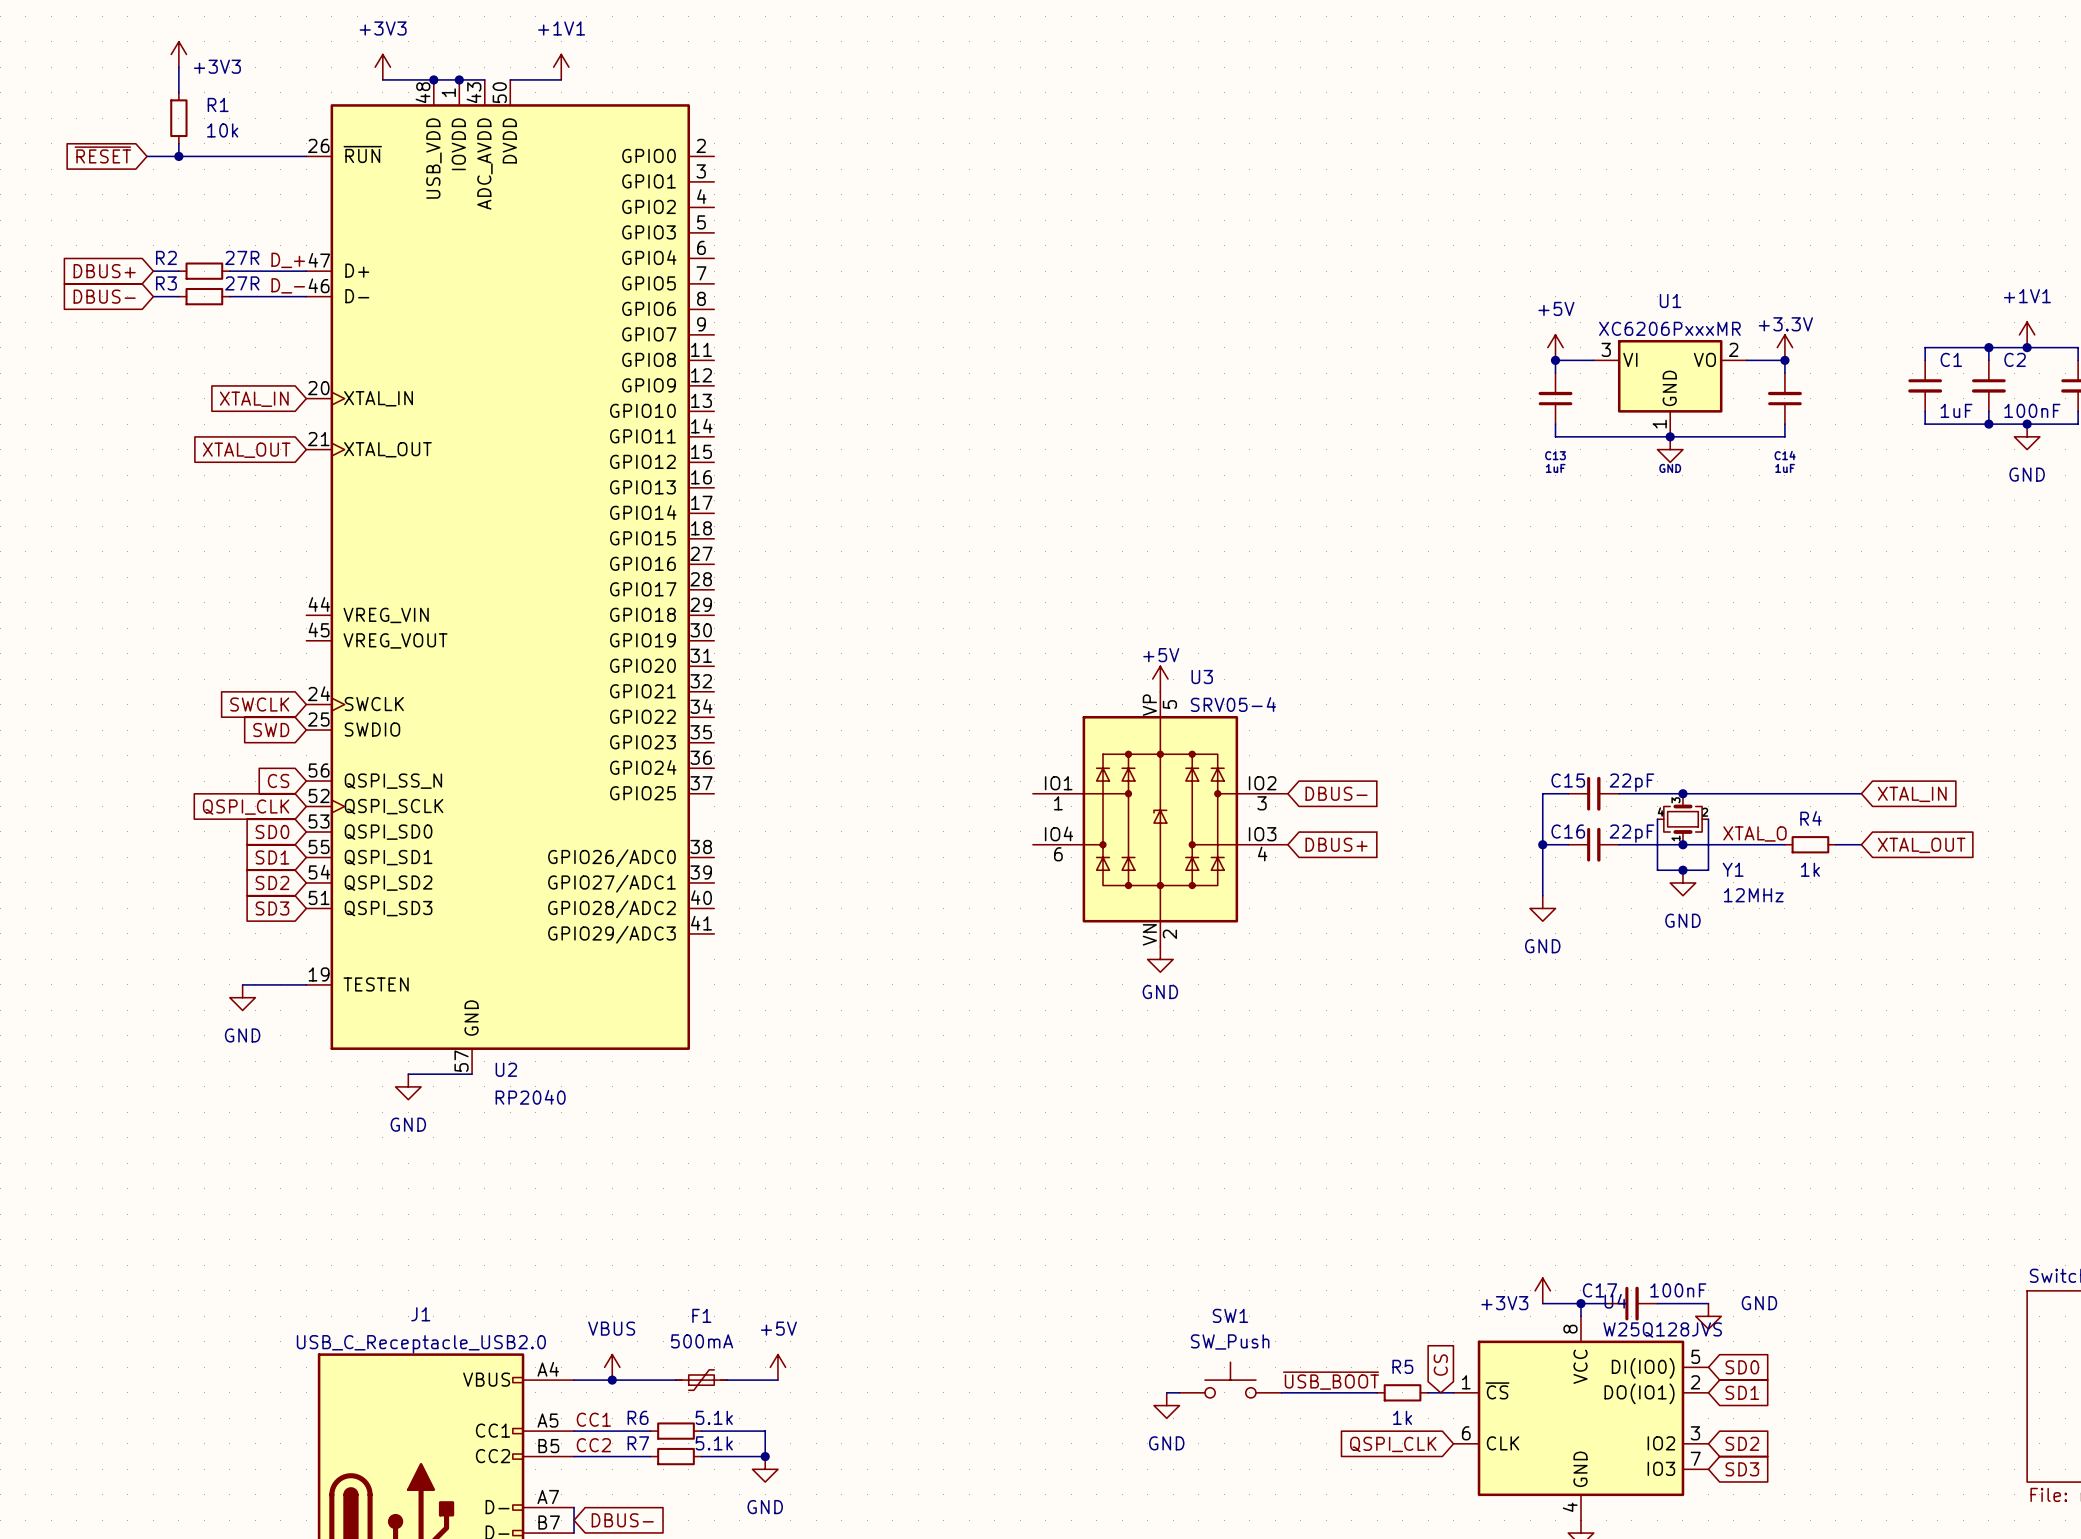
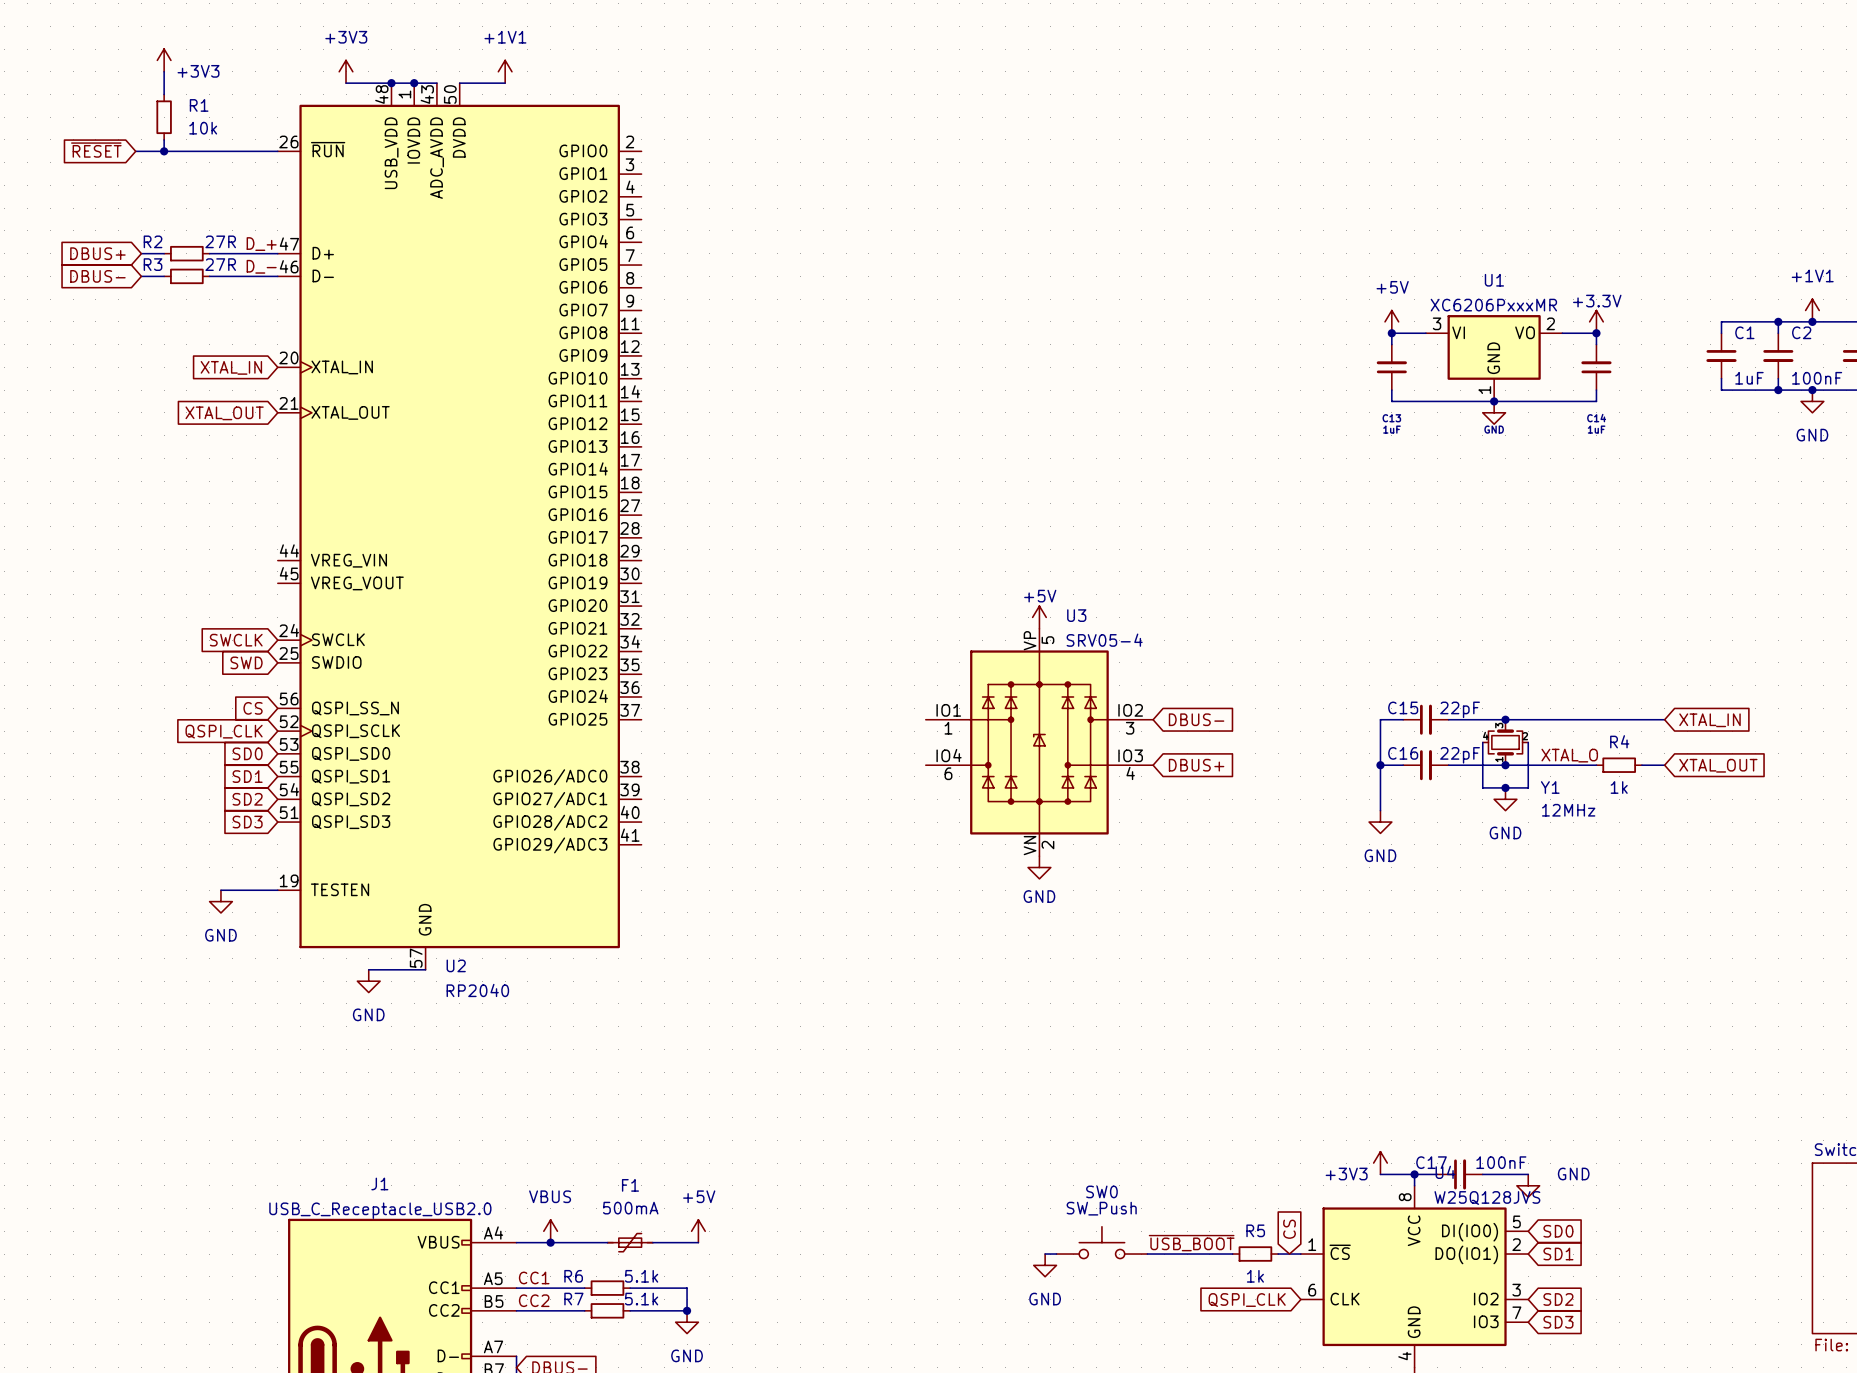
SW1 name: SW1 (1230, 1315) -> SW0 (1101, 1191)

